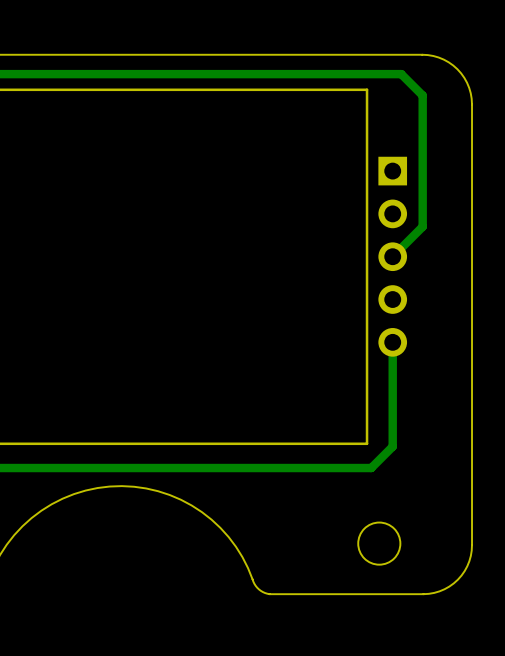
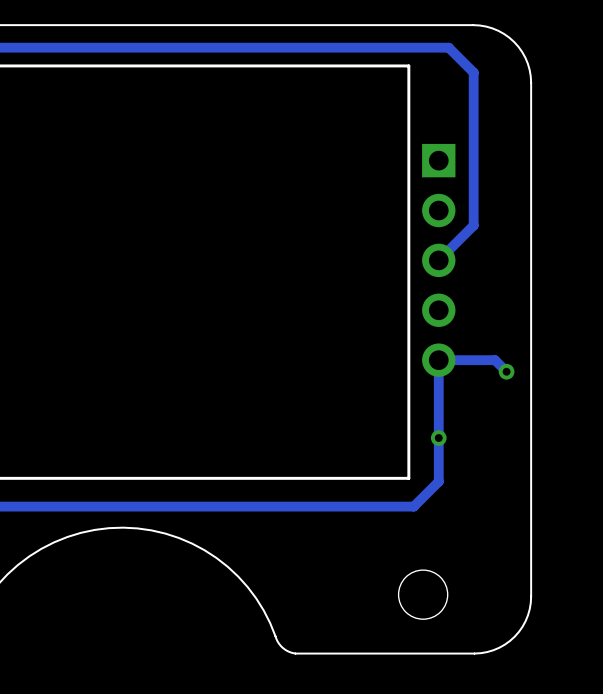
track: none -> (438, 360) (495, 360) (506, 371)
via: none -> (506, 371)
via: none -> (438, 438)

